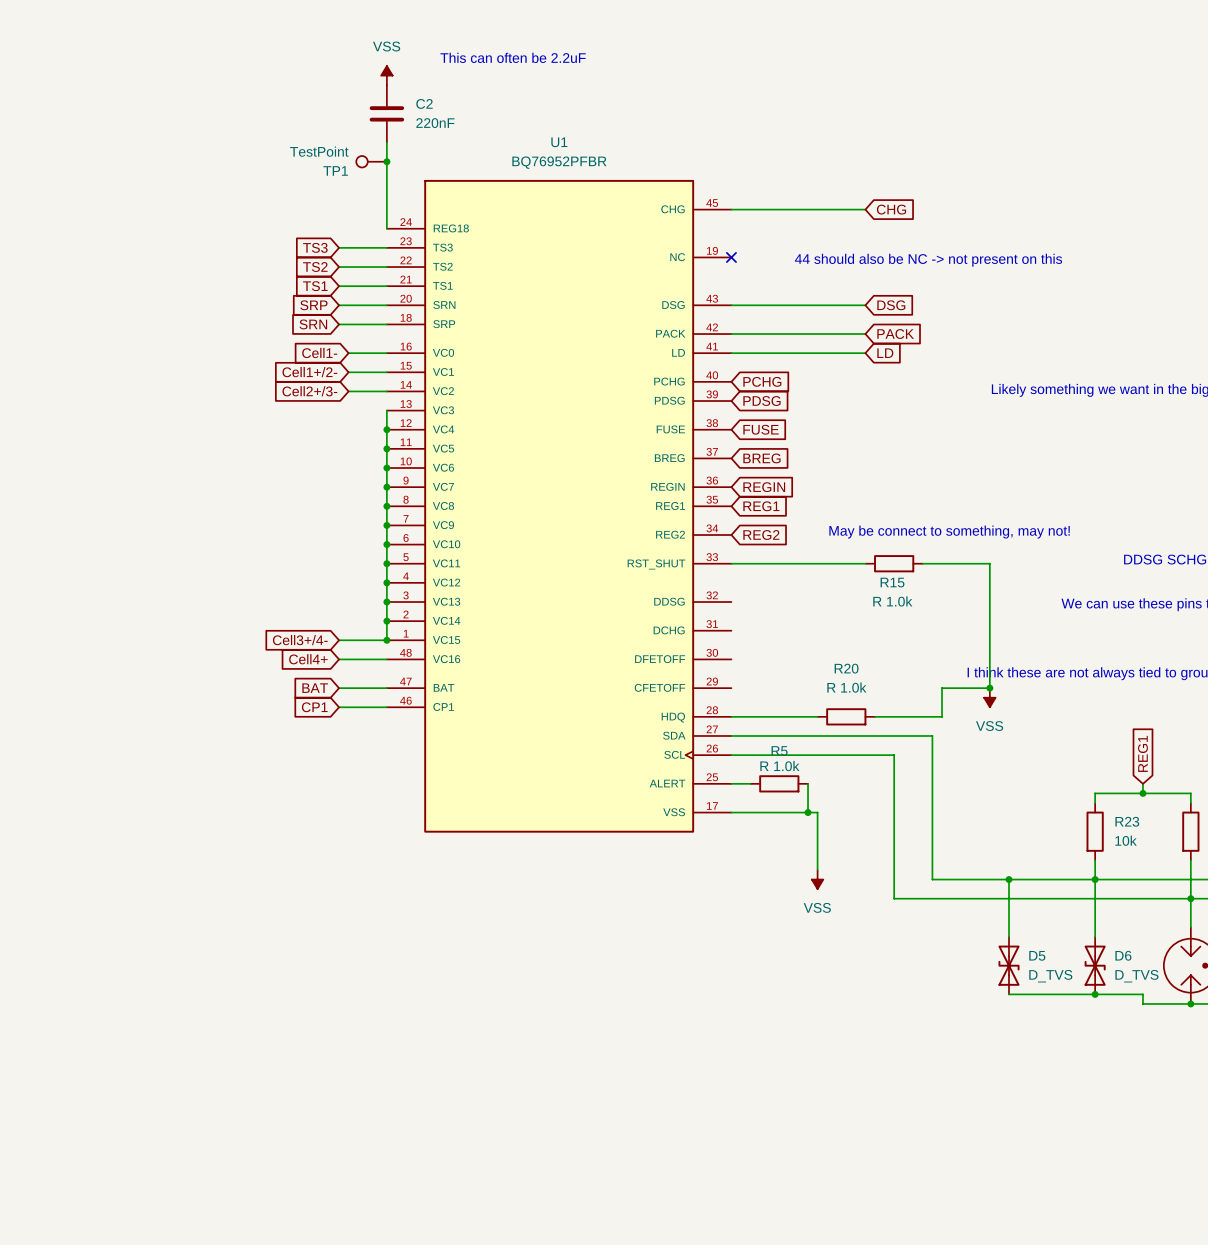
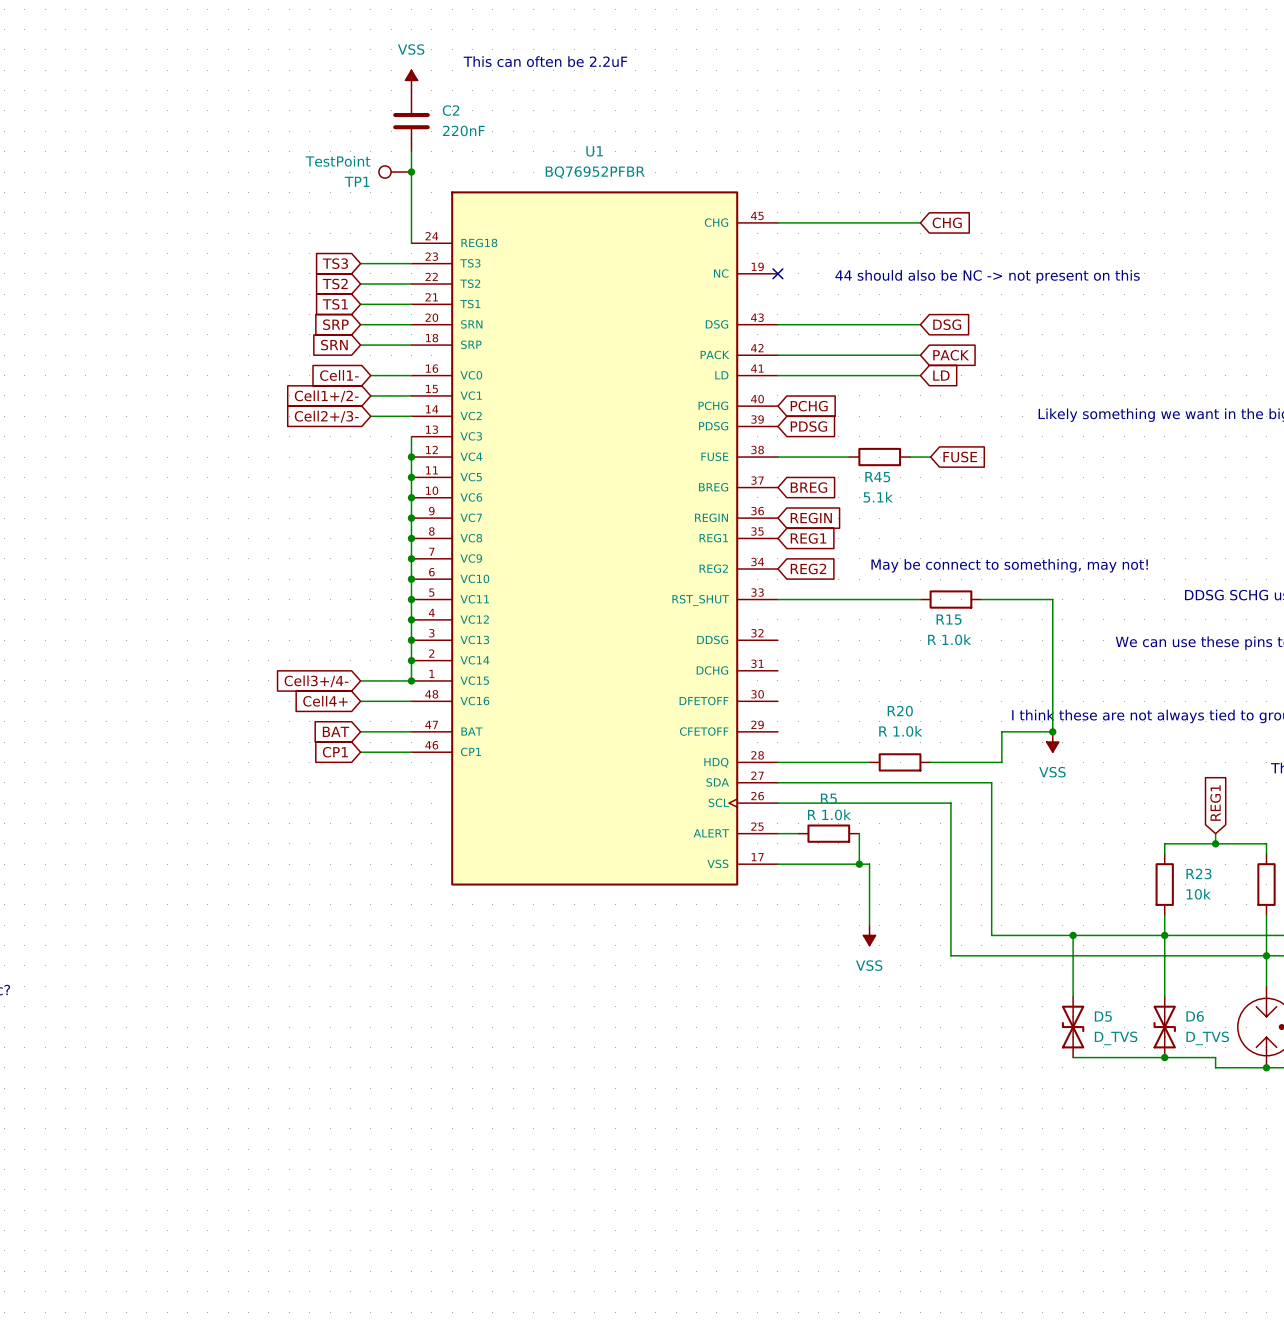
wire: none -> (777, 457) (849, 457)
global label position: FUSE (761, 429) -> FUSE (960, 457)
R45: none -> 5.1k (879, 457)
wire: none -> (910, 457) (930, 457)

